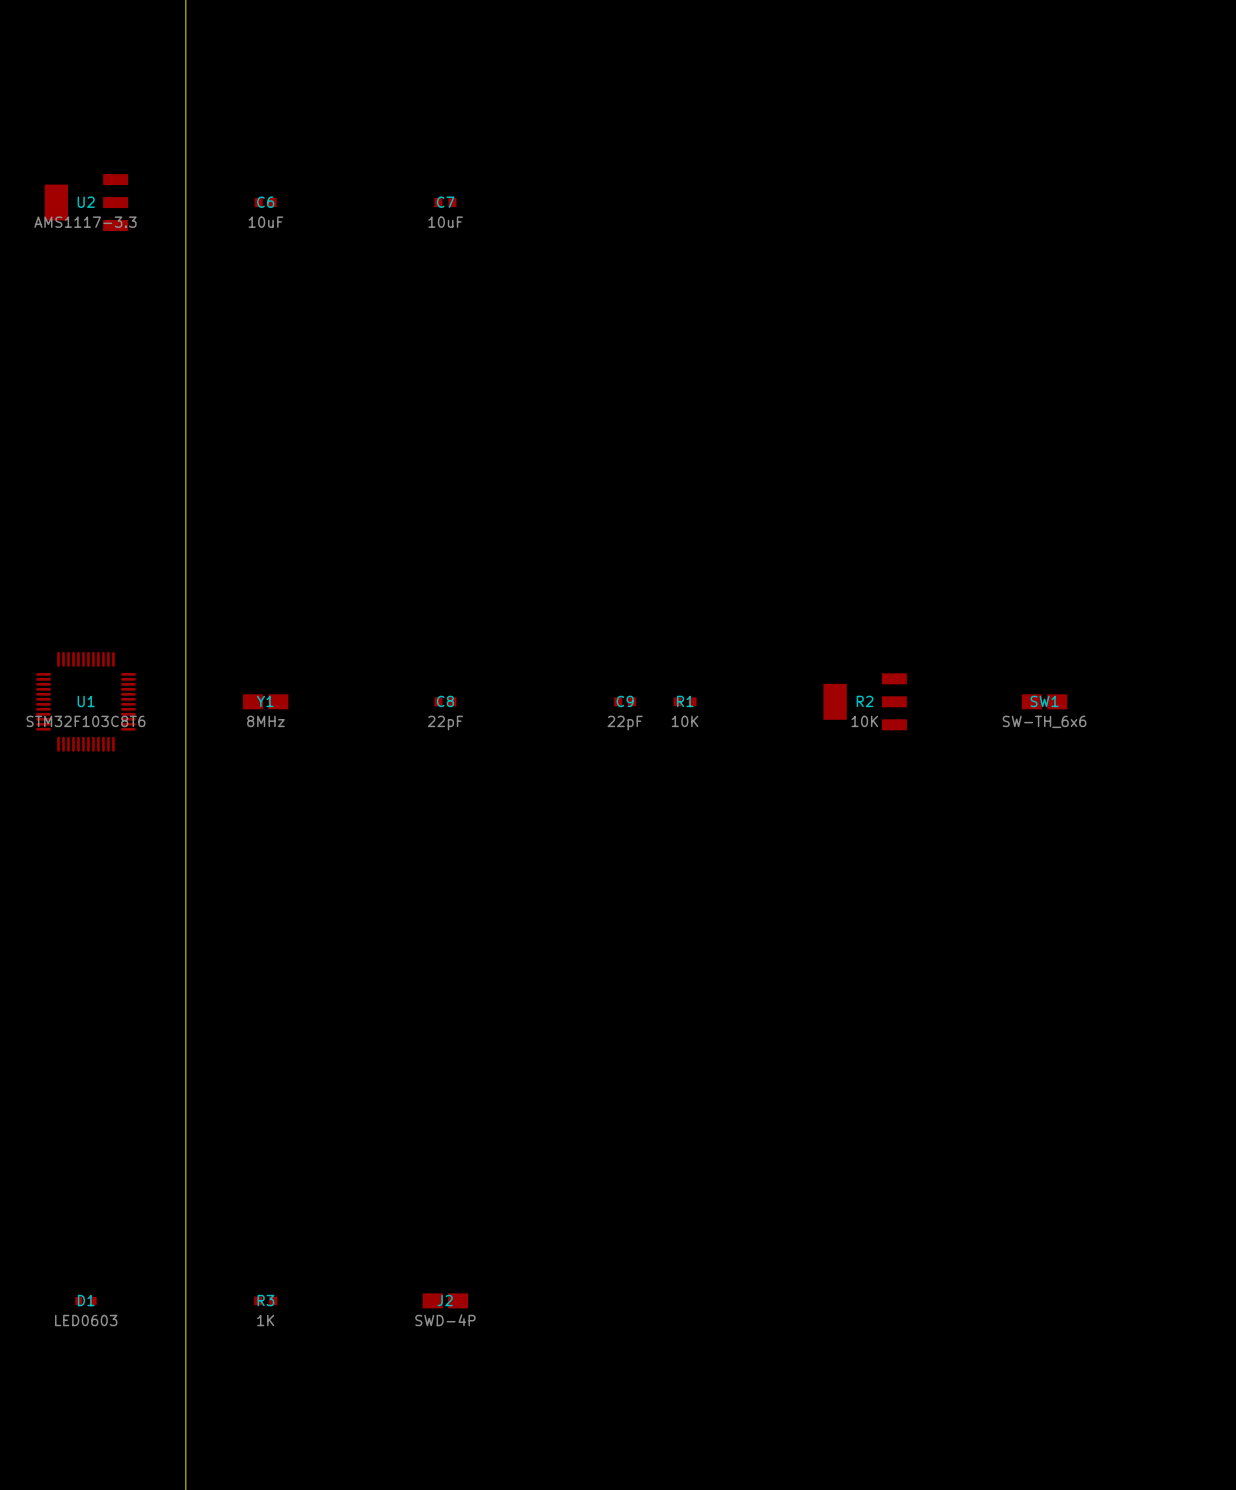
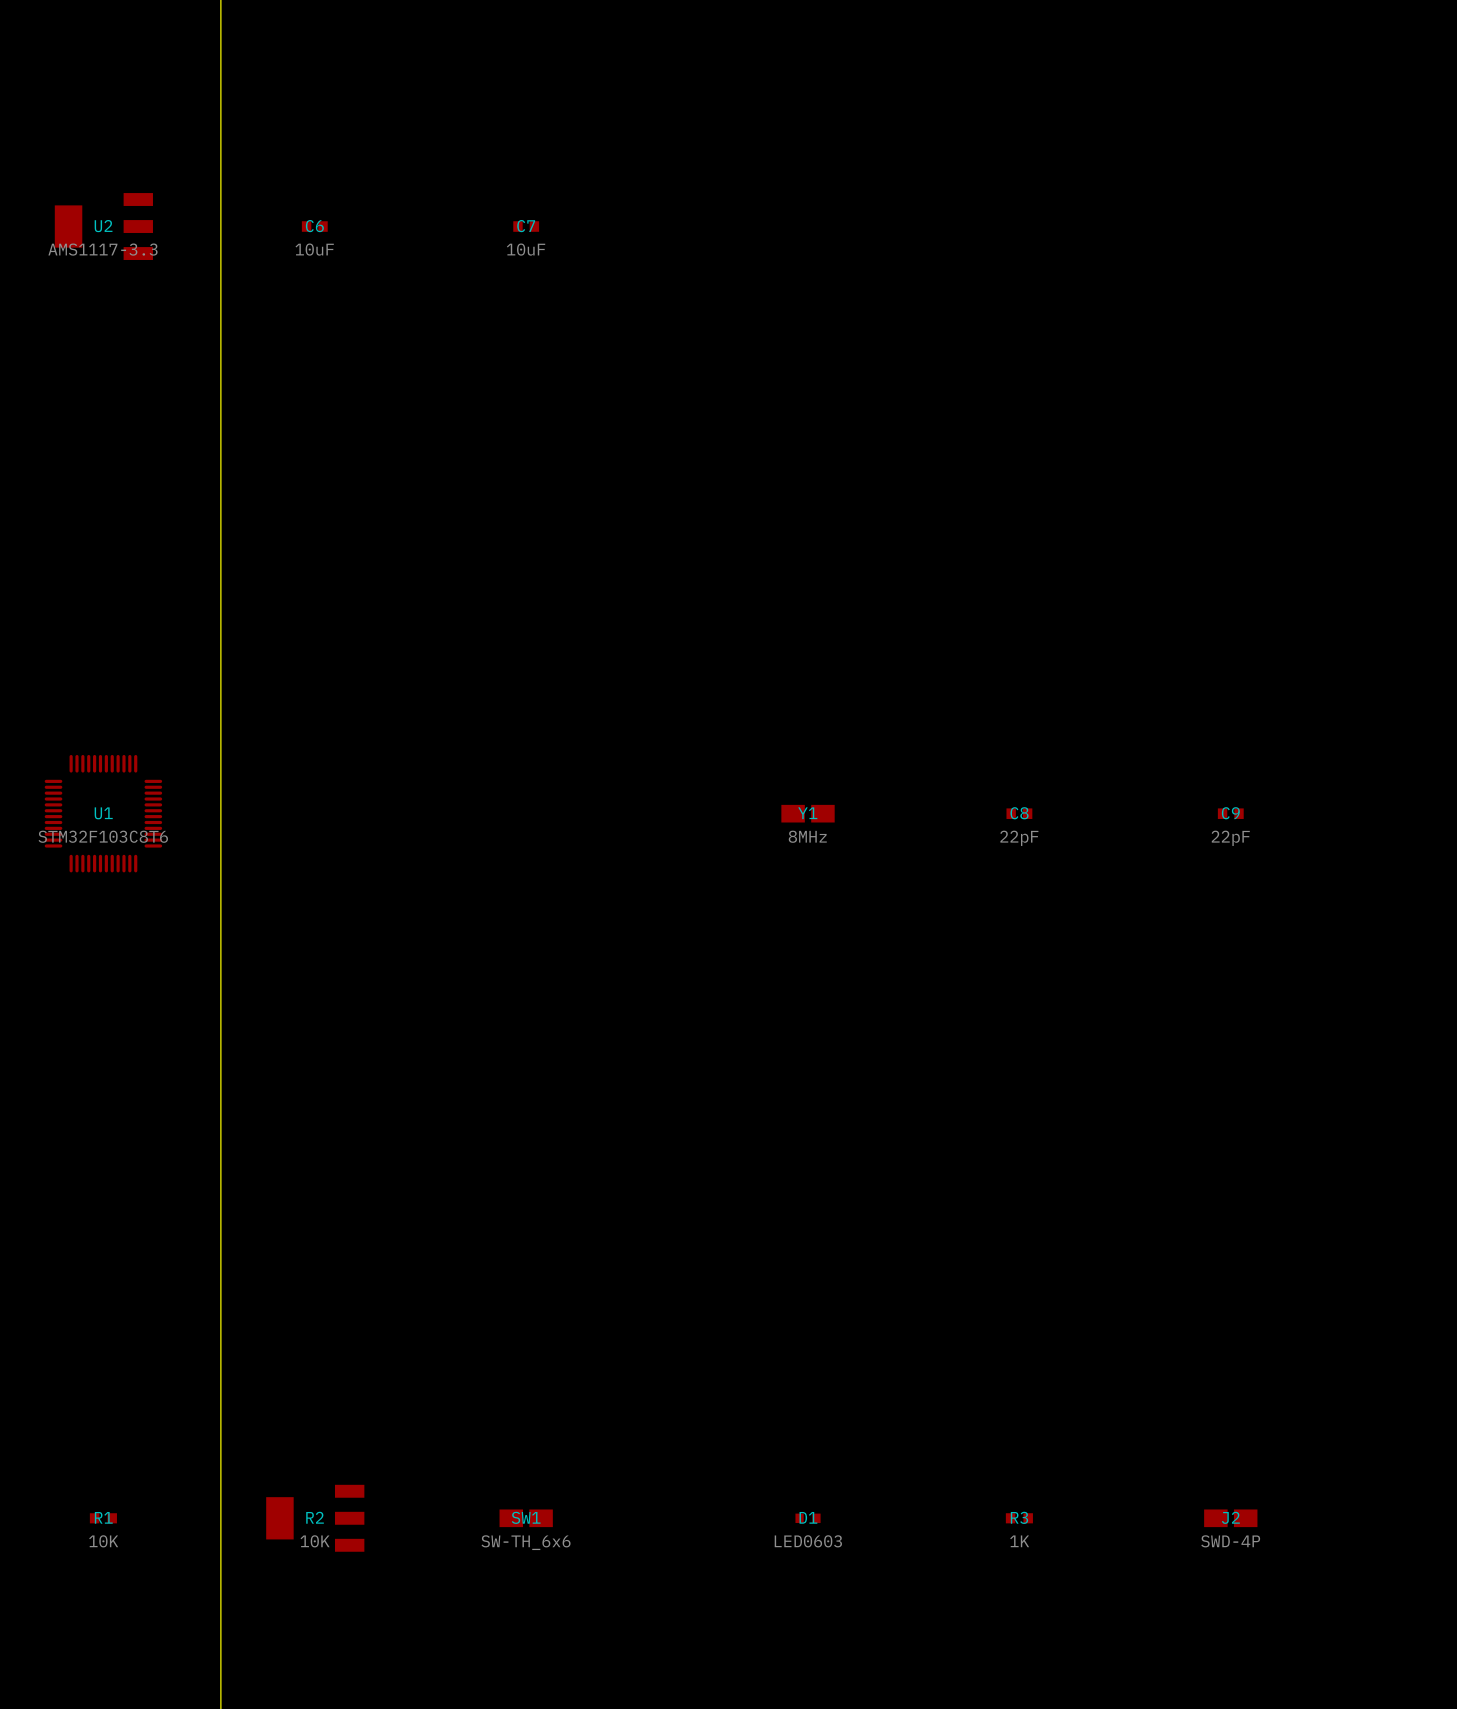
Y1 position: (265, 701) -> (808, 813)
C8 position: (445, 701) -> (1019, 813)
C9 position: (625, 701) -> (1230, 813)
R1 position: (685, 701) -> (103, 1518)
R2 position: (865, 701) -> (315, 1518)
SW1: SW-TH_6x6 (1044, 701) -> none
D1 position: (85, 1300) -> (808, 1518)
R3 position: (265, 1300) -> (1019, 1518)
J2 name: J2 (445, 1300) -> SW1 (526, 1517)
J2: none -> SWD-4P (1230, 1518)
J2 value: SWD-4P (445, 1320) -> SW-TH_6x6 (526, 1542)

